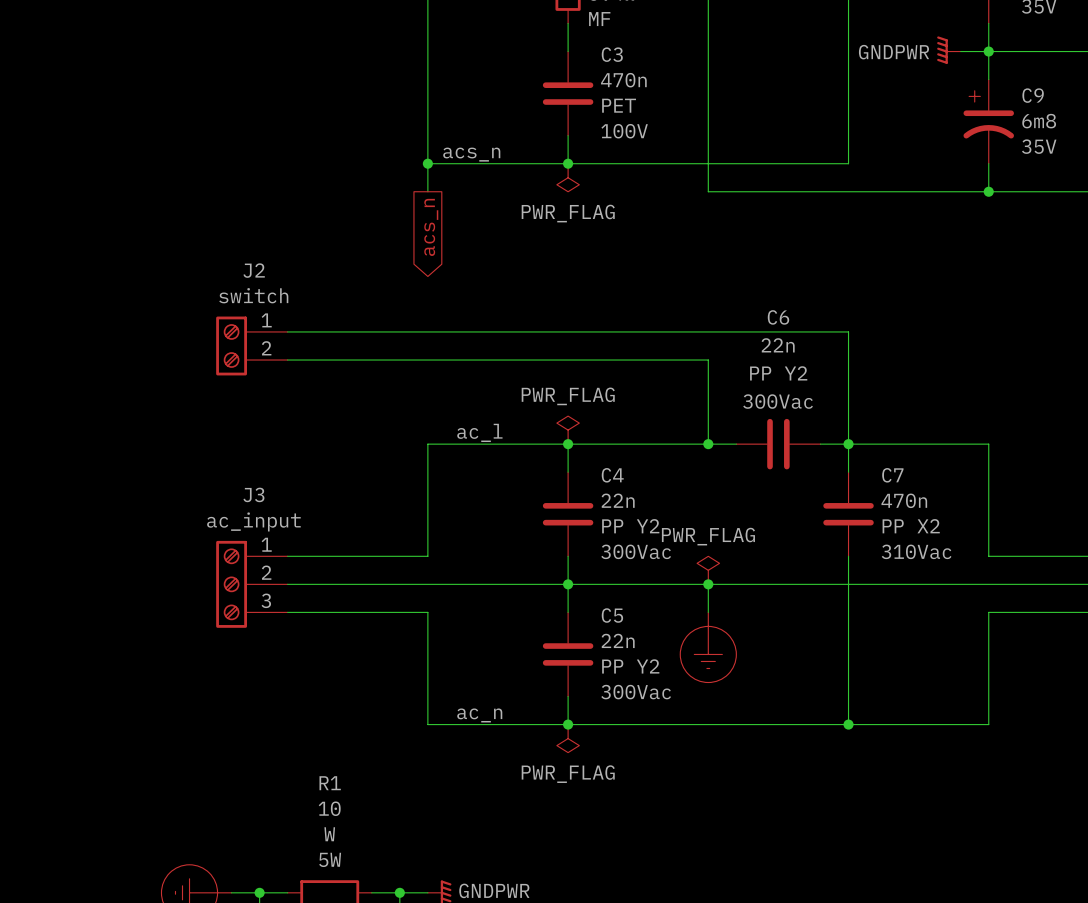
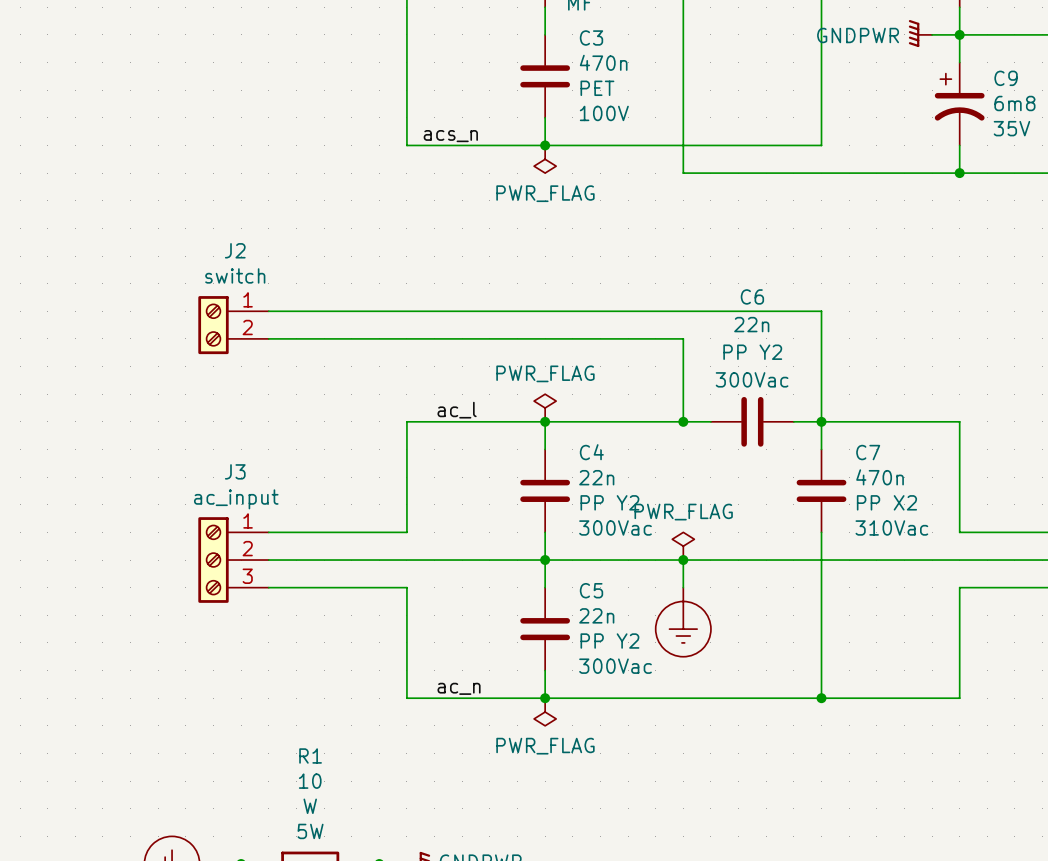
wire: (427, 163) (427, 191) -> none
junction: (427, 163) -> none
global label: acs_n (431, 227) -> none

